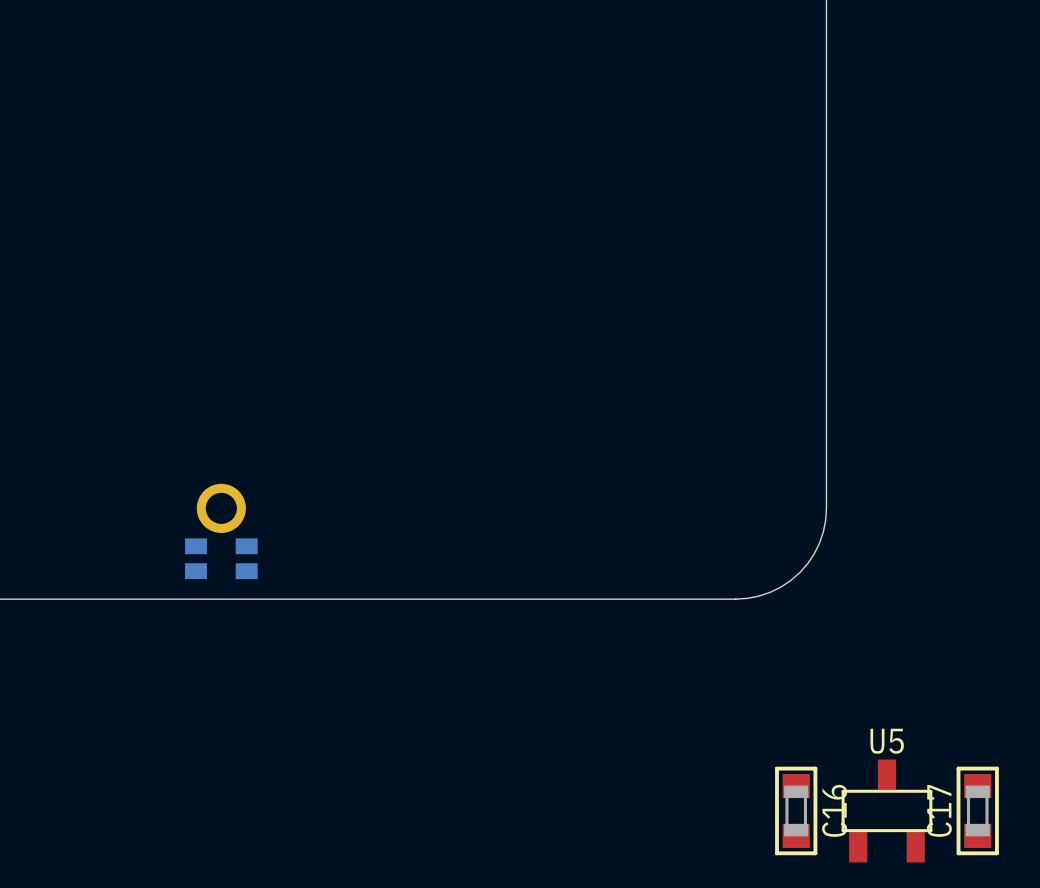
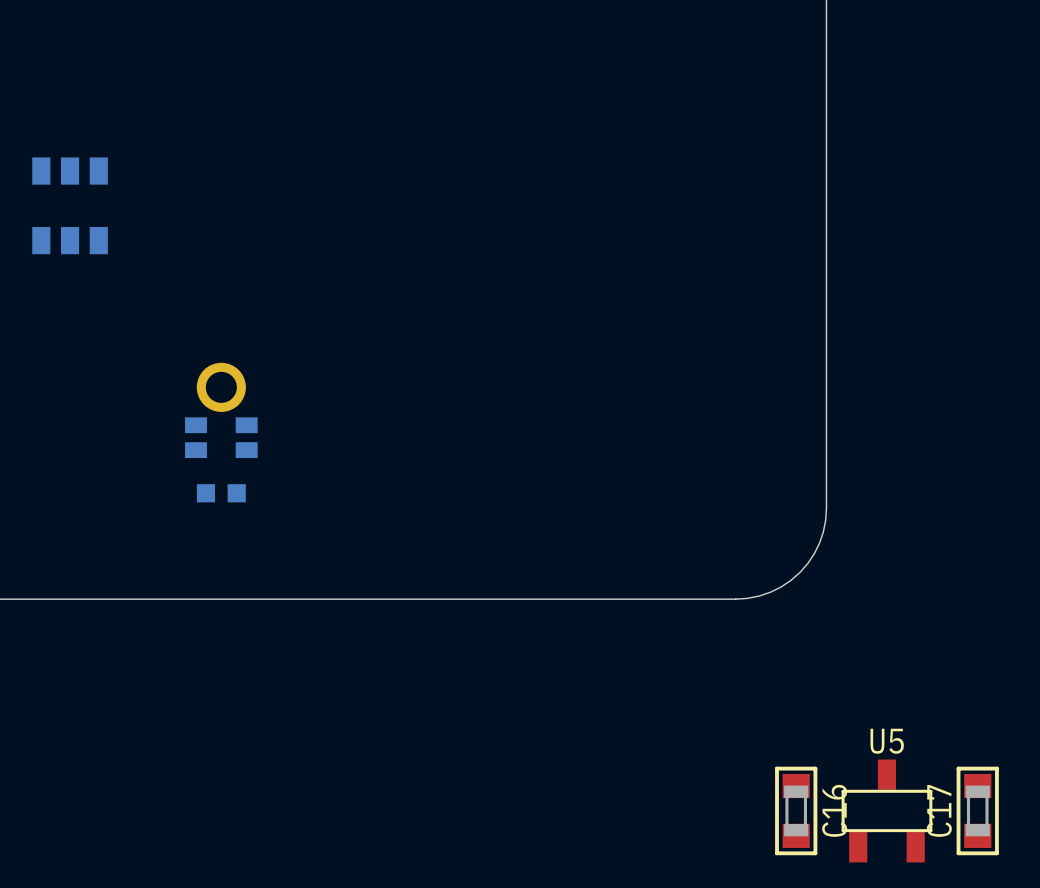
part: none -> (70, 205)
part: none -> (221, 493)
part position: (221, 531) -> (221, 410)

